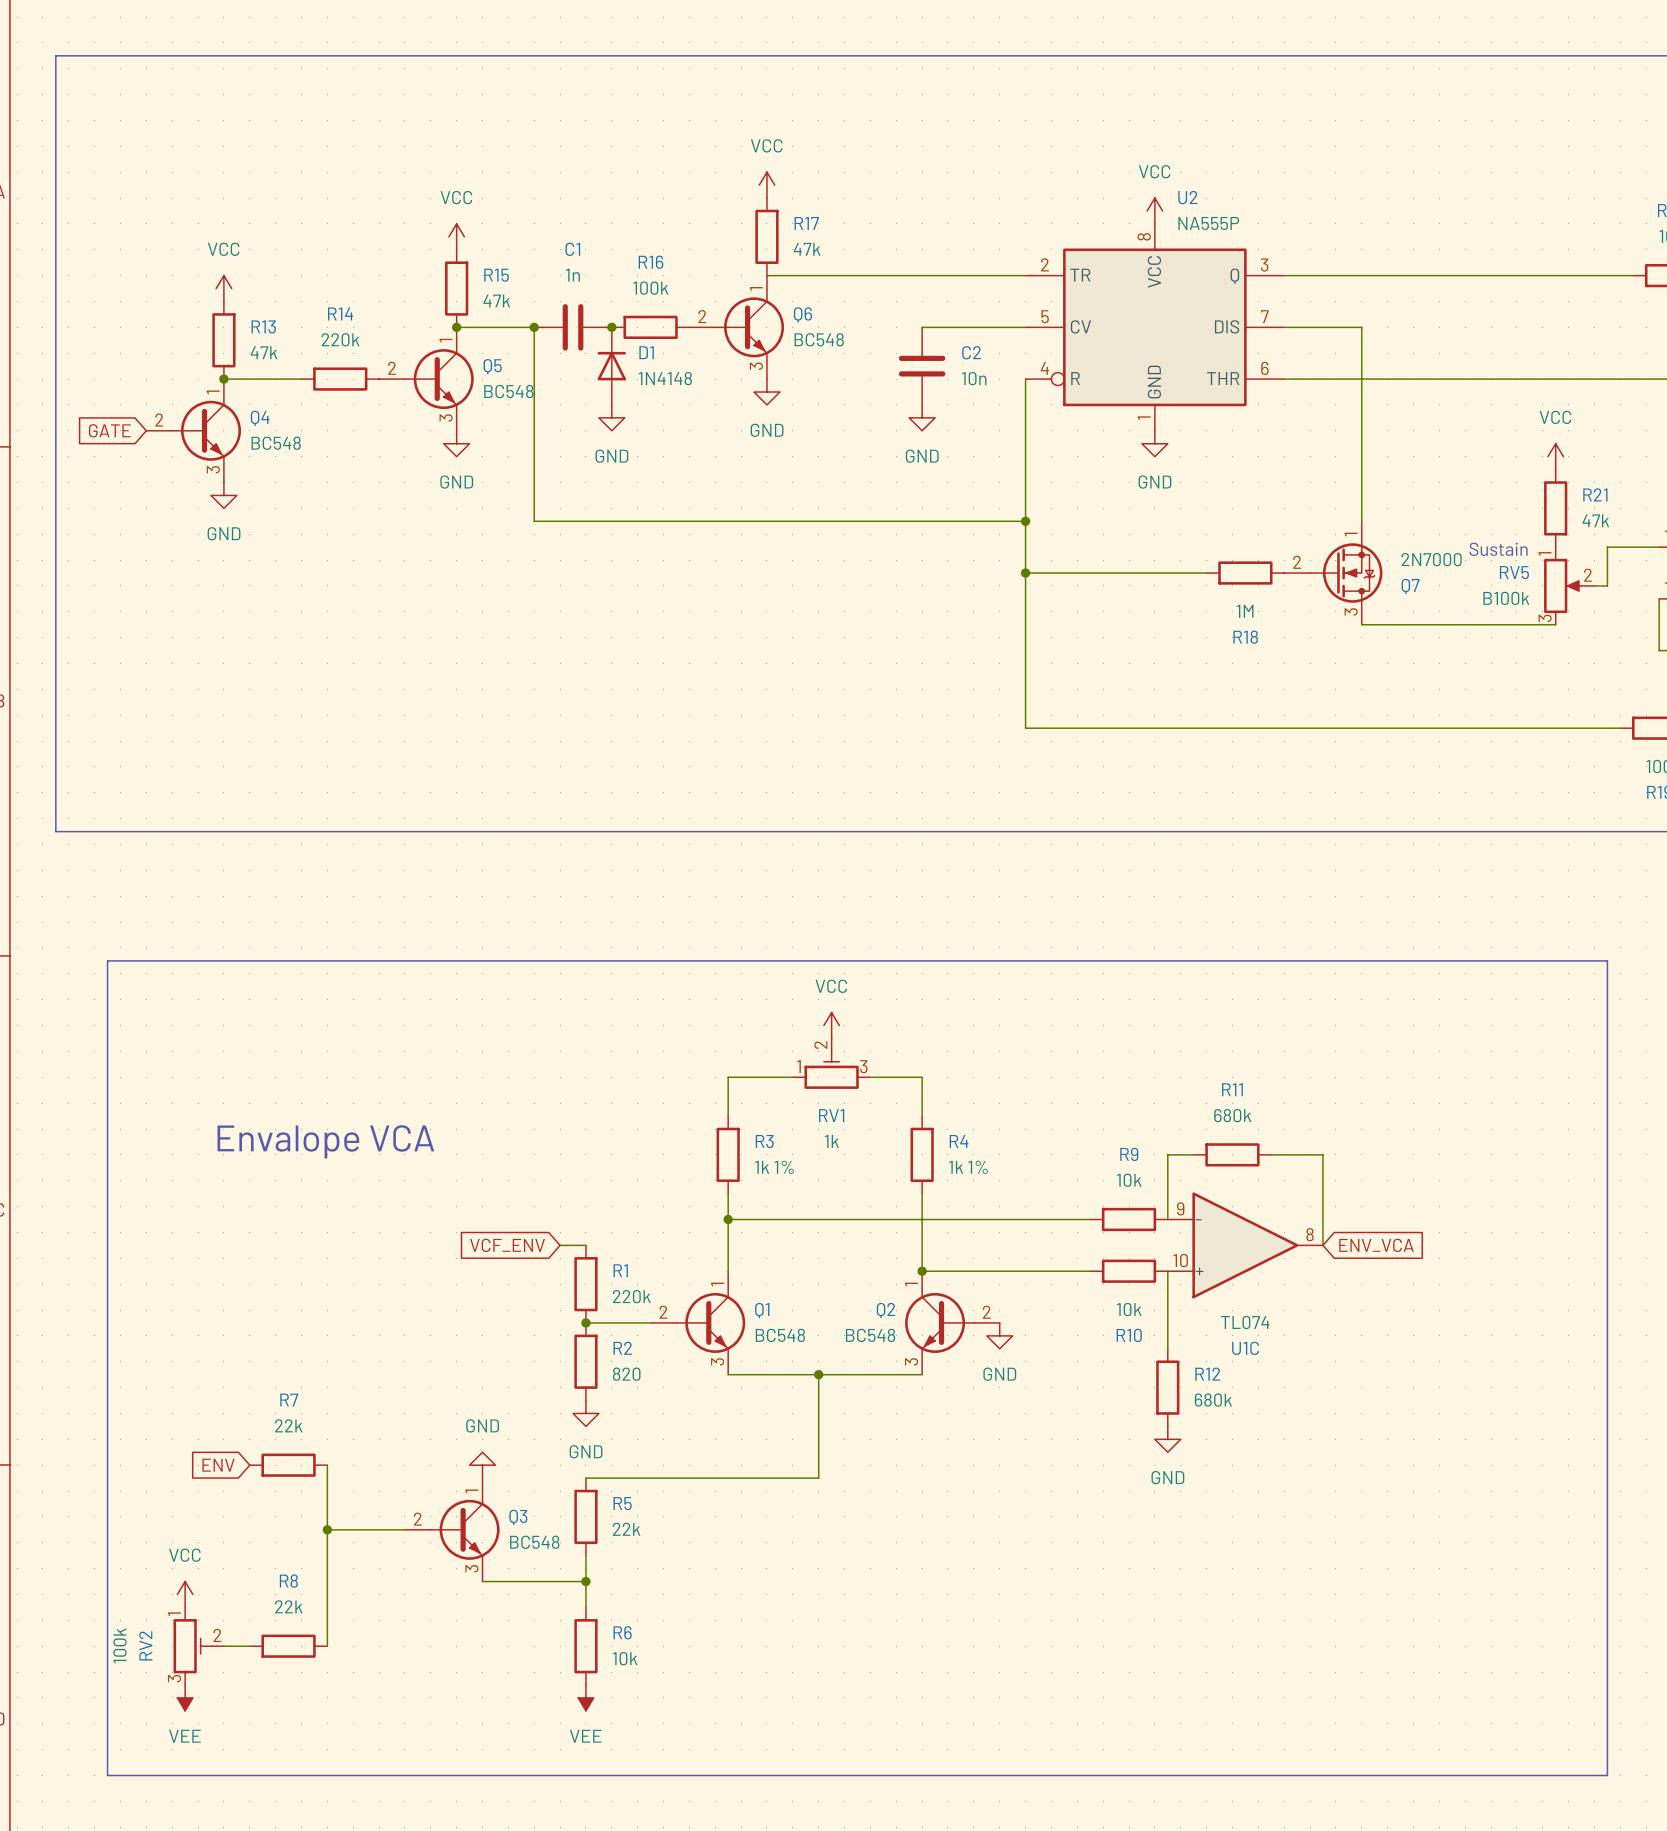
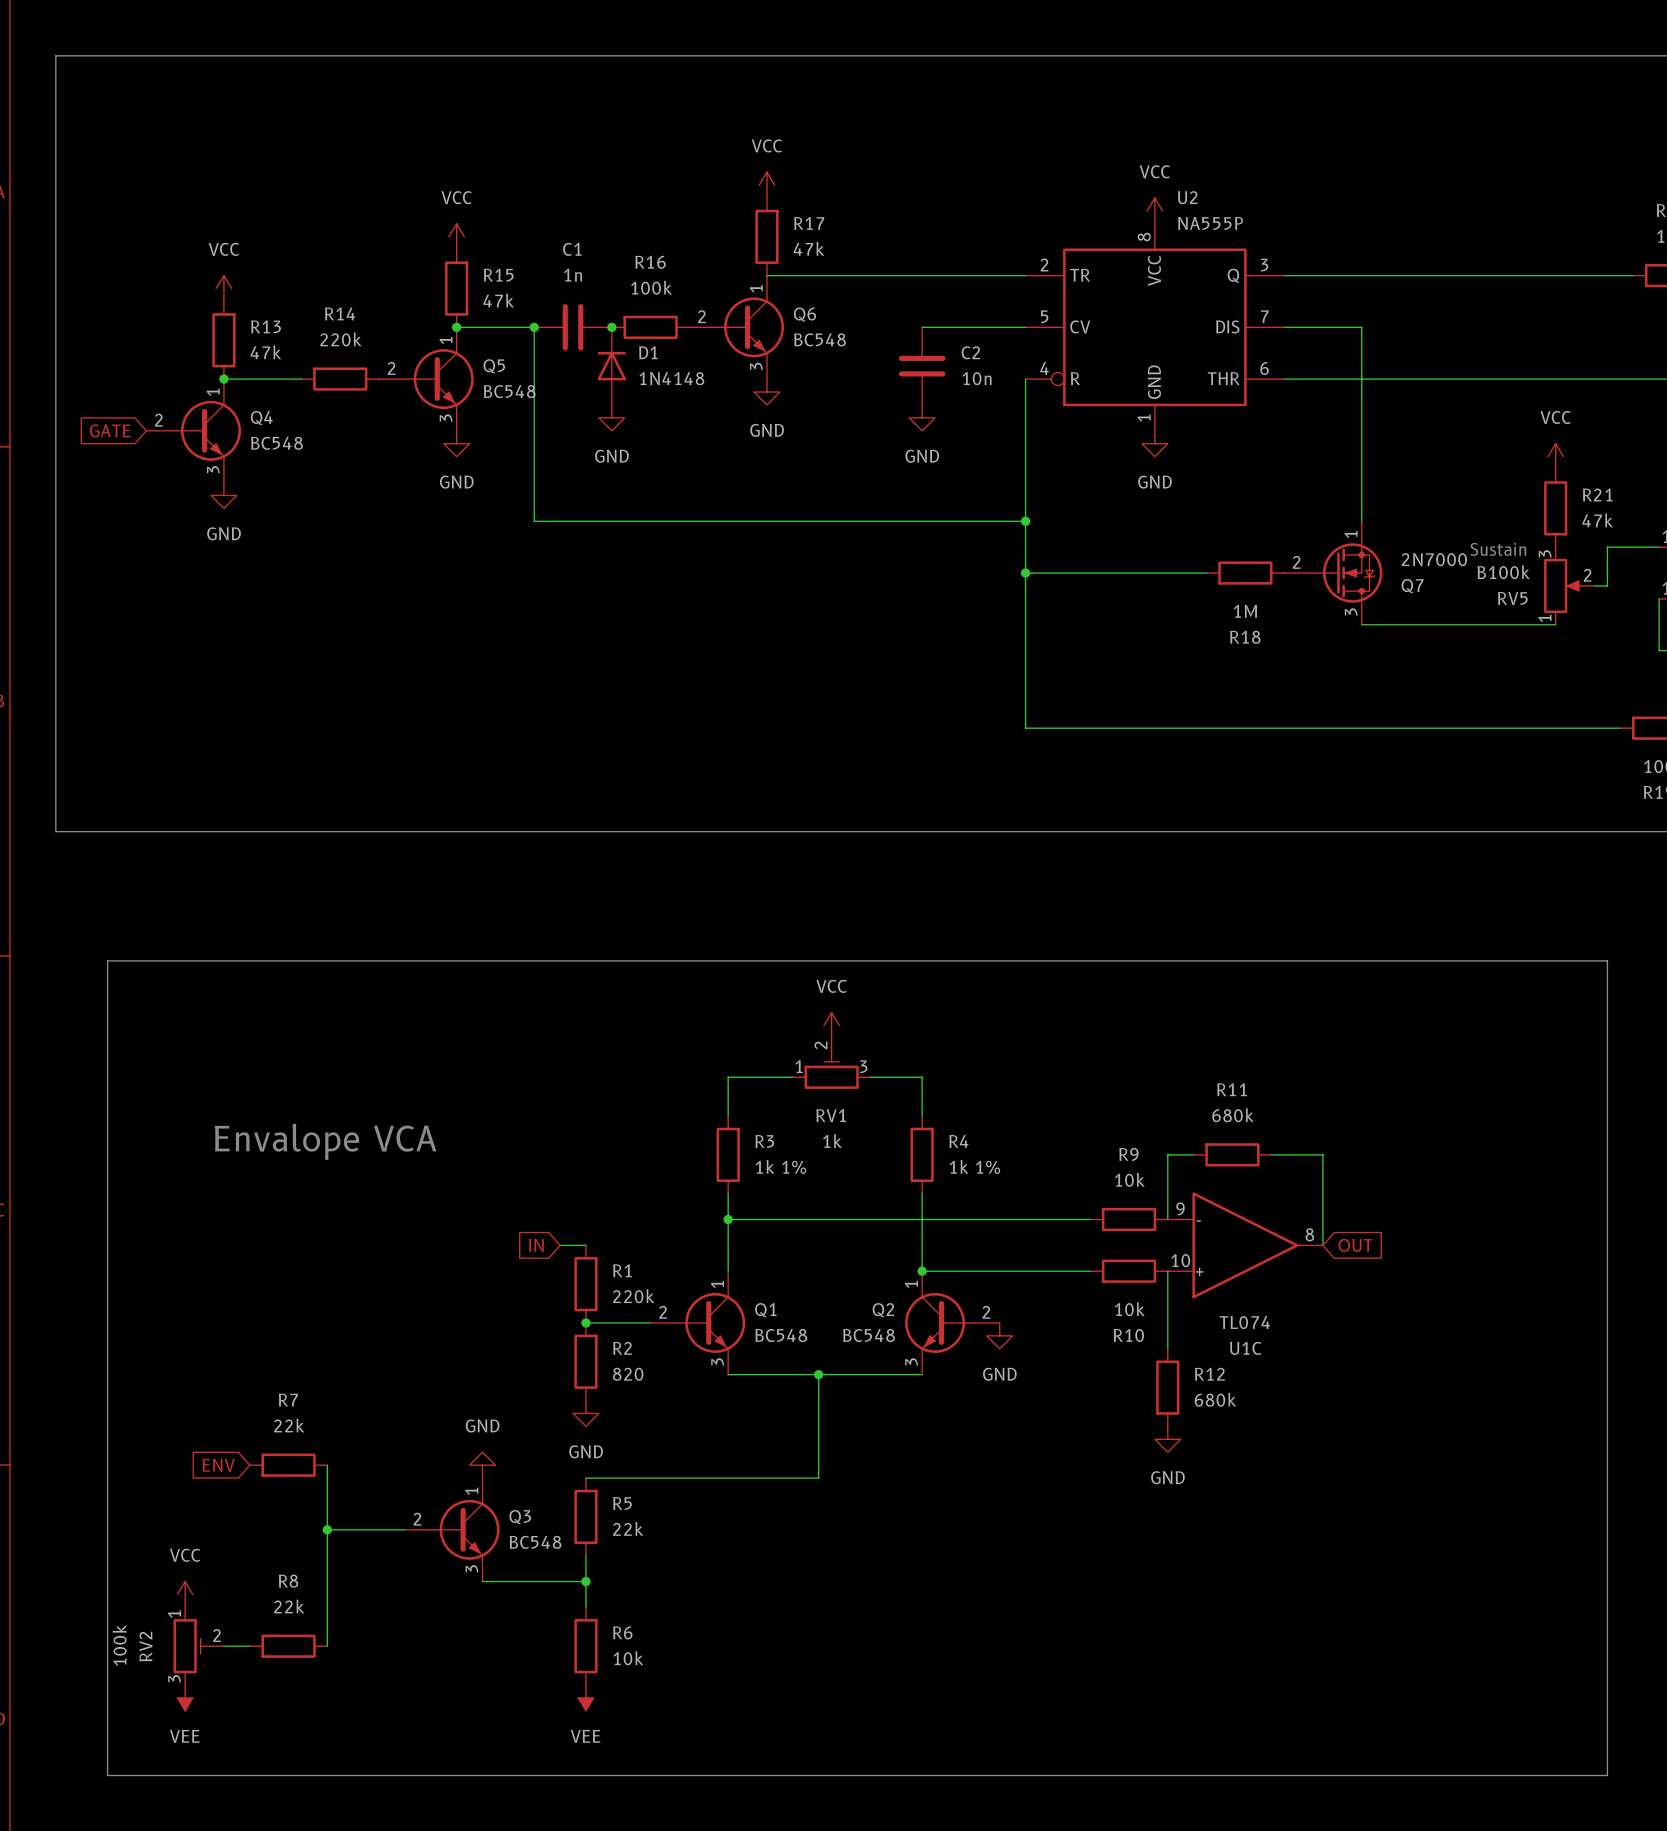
RV5 flip: as is (1562, 585) -> up-down (1562, 585)
global label: VCF_ENV (507, 1245) -> IN (536, 1245)
global label: ENV_VCA (1376, 1245) -> OUT (1355, 1245)

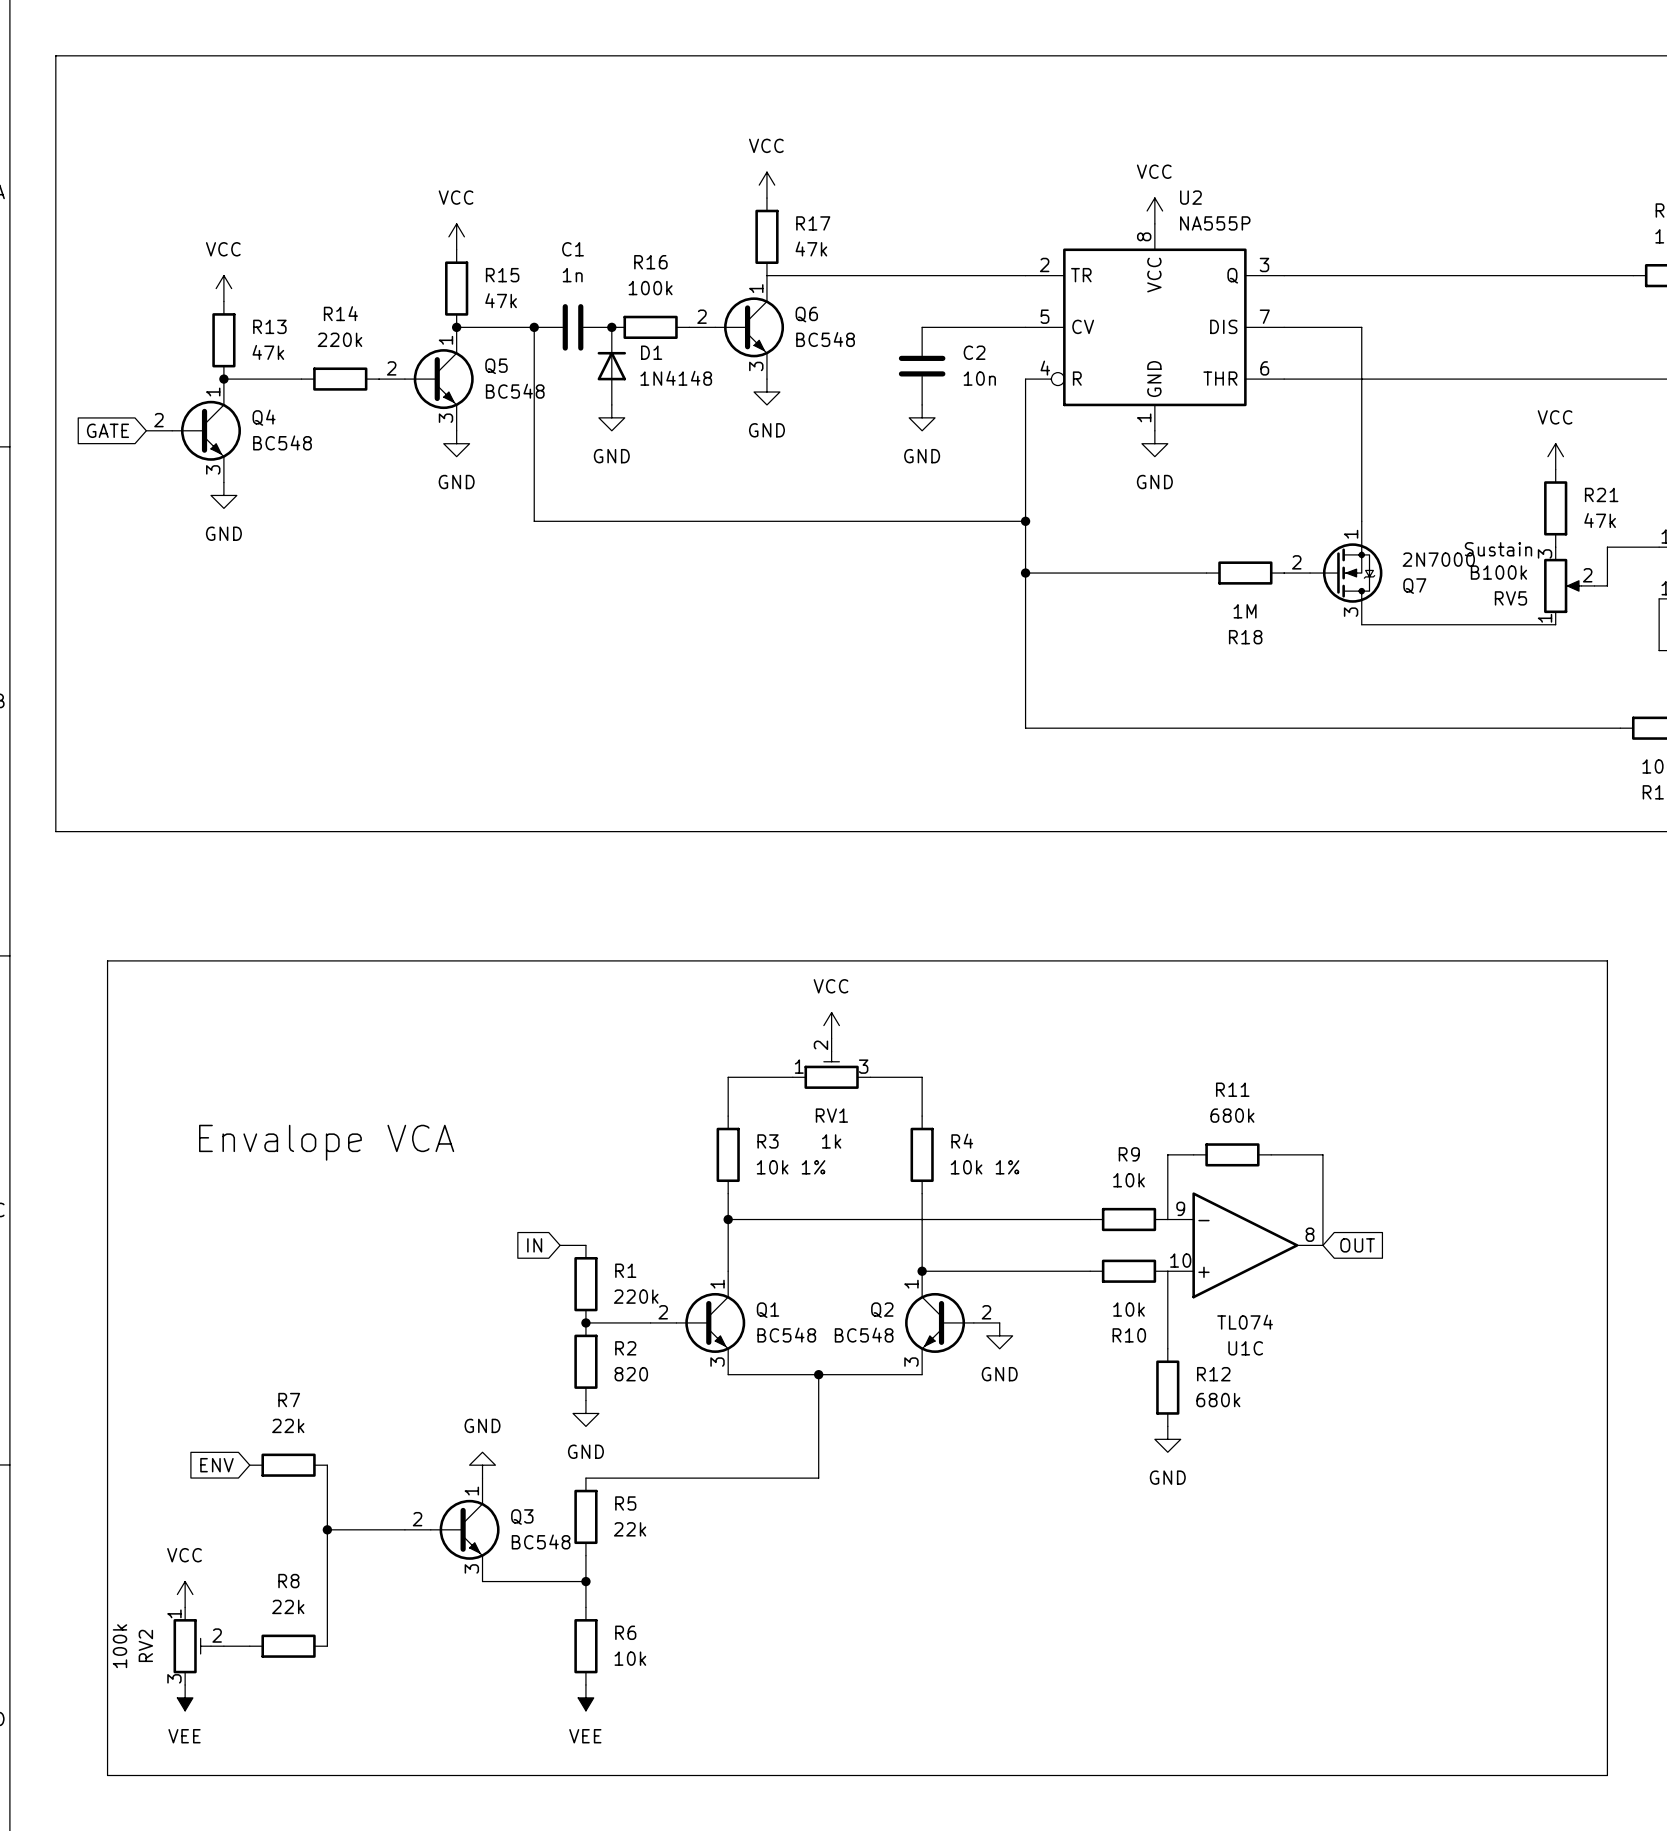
R3 value: 1k 1% (780, 1166) -> 10k 1% (791, 1167)
R4 value: 1k 1% (974, 1166) -> 10k 1% (985, 1167)

